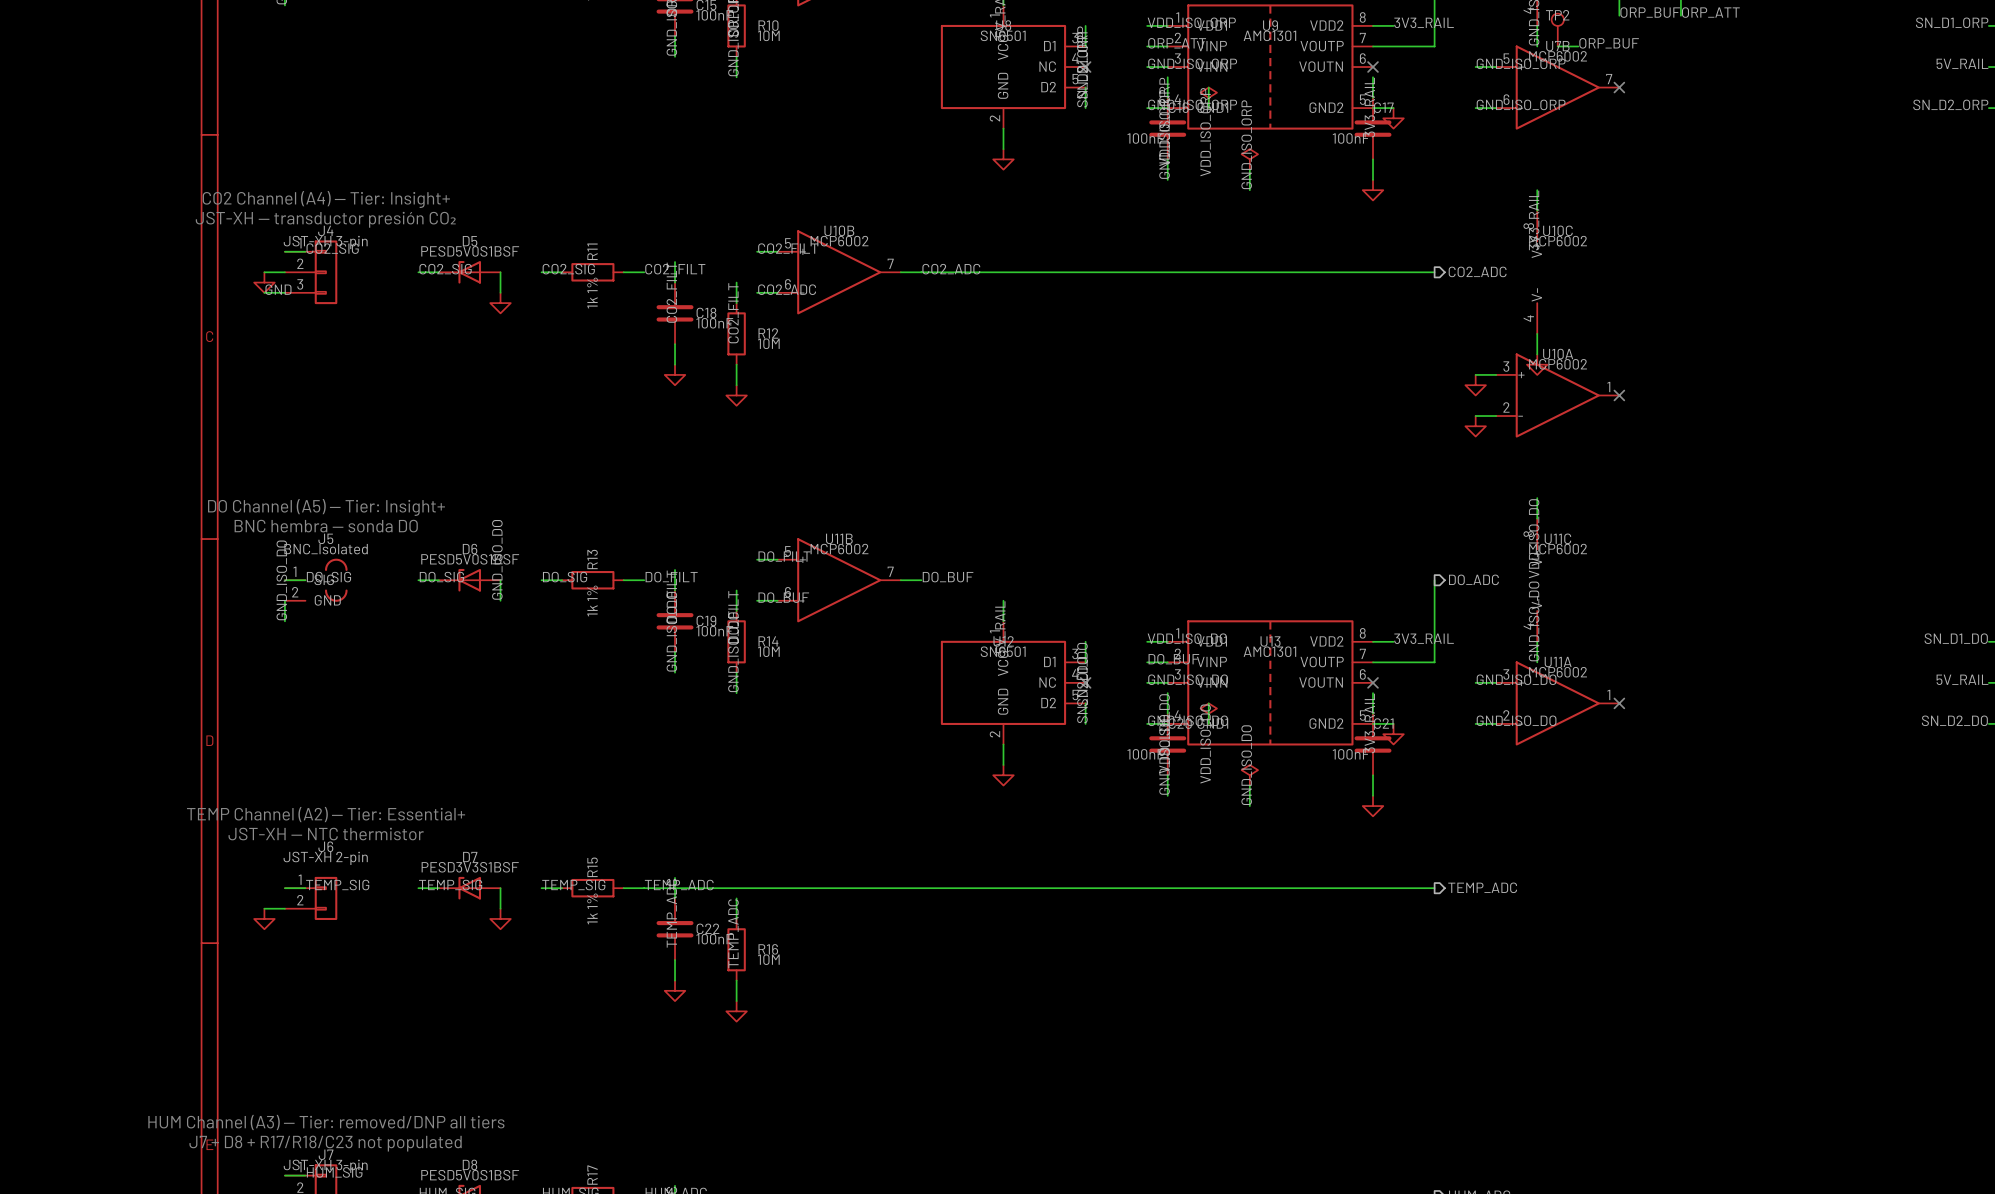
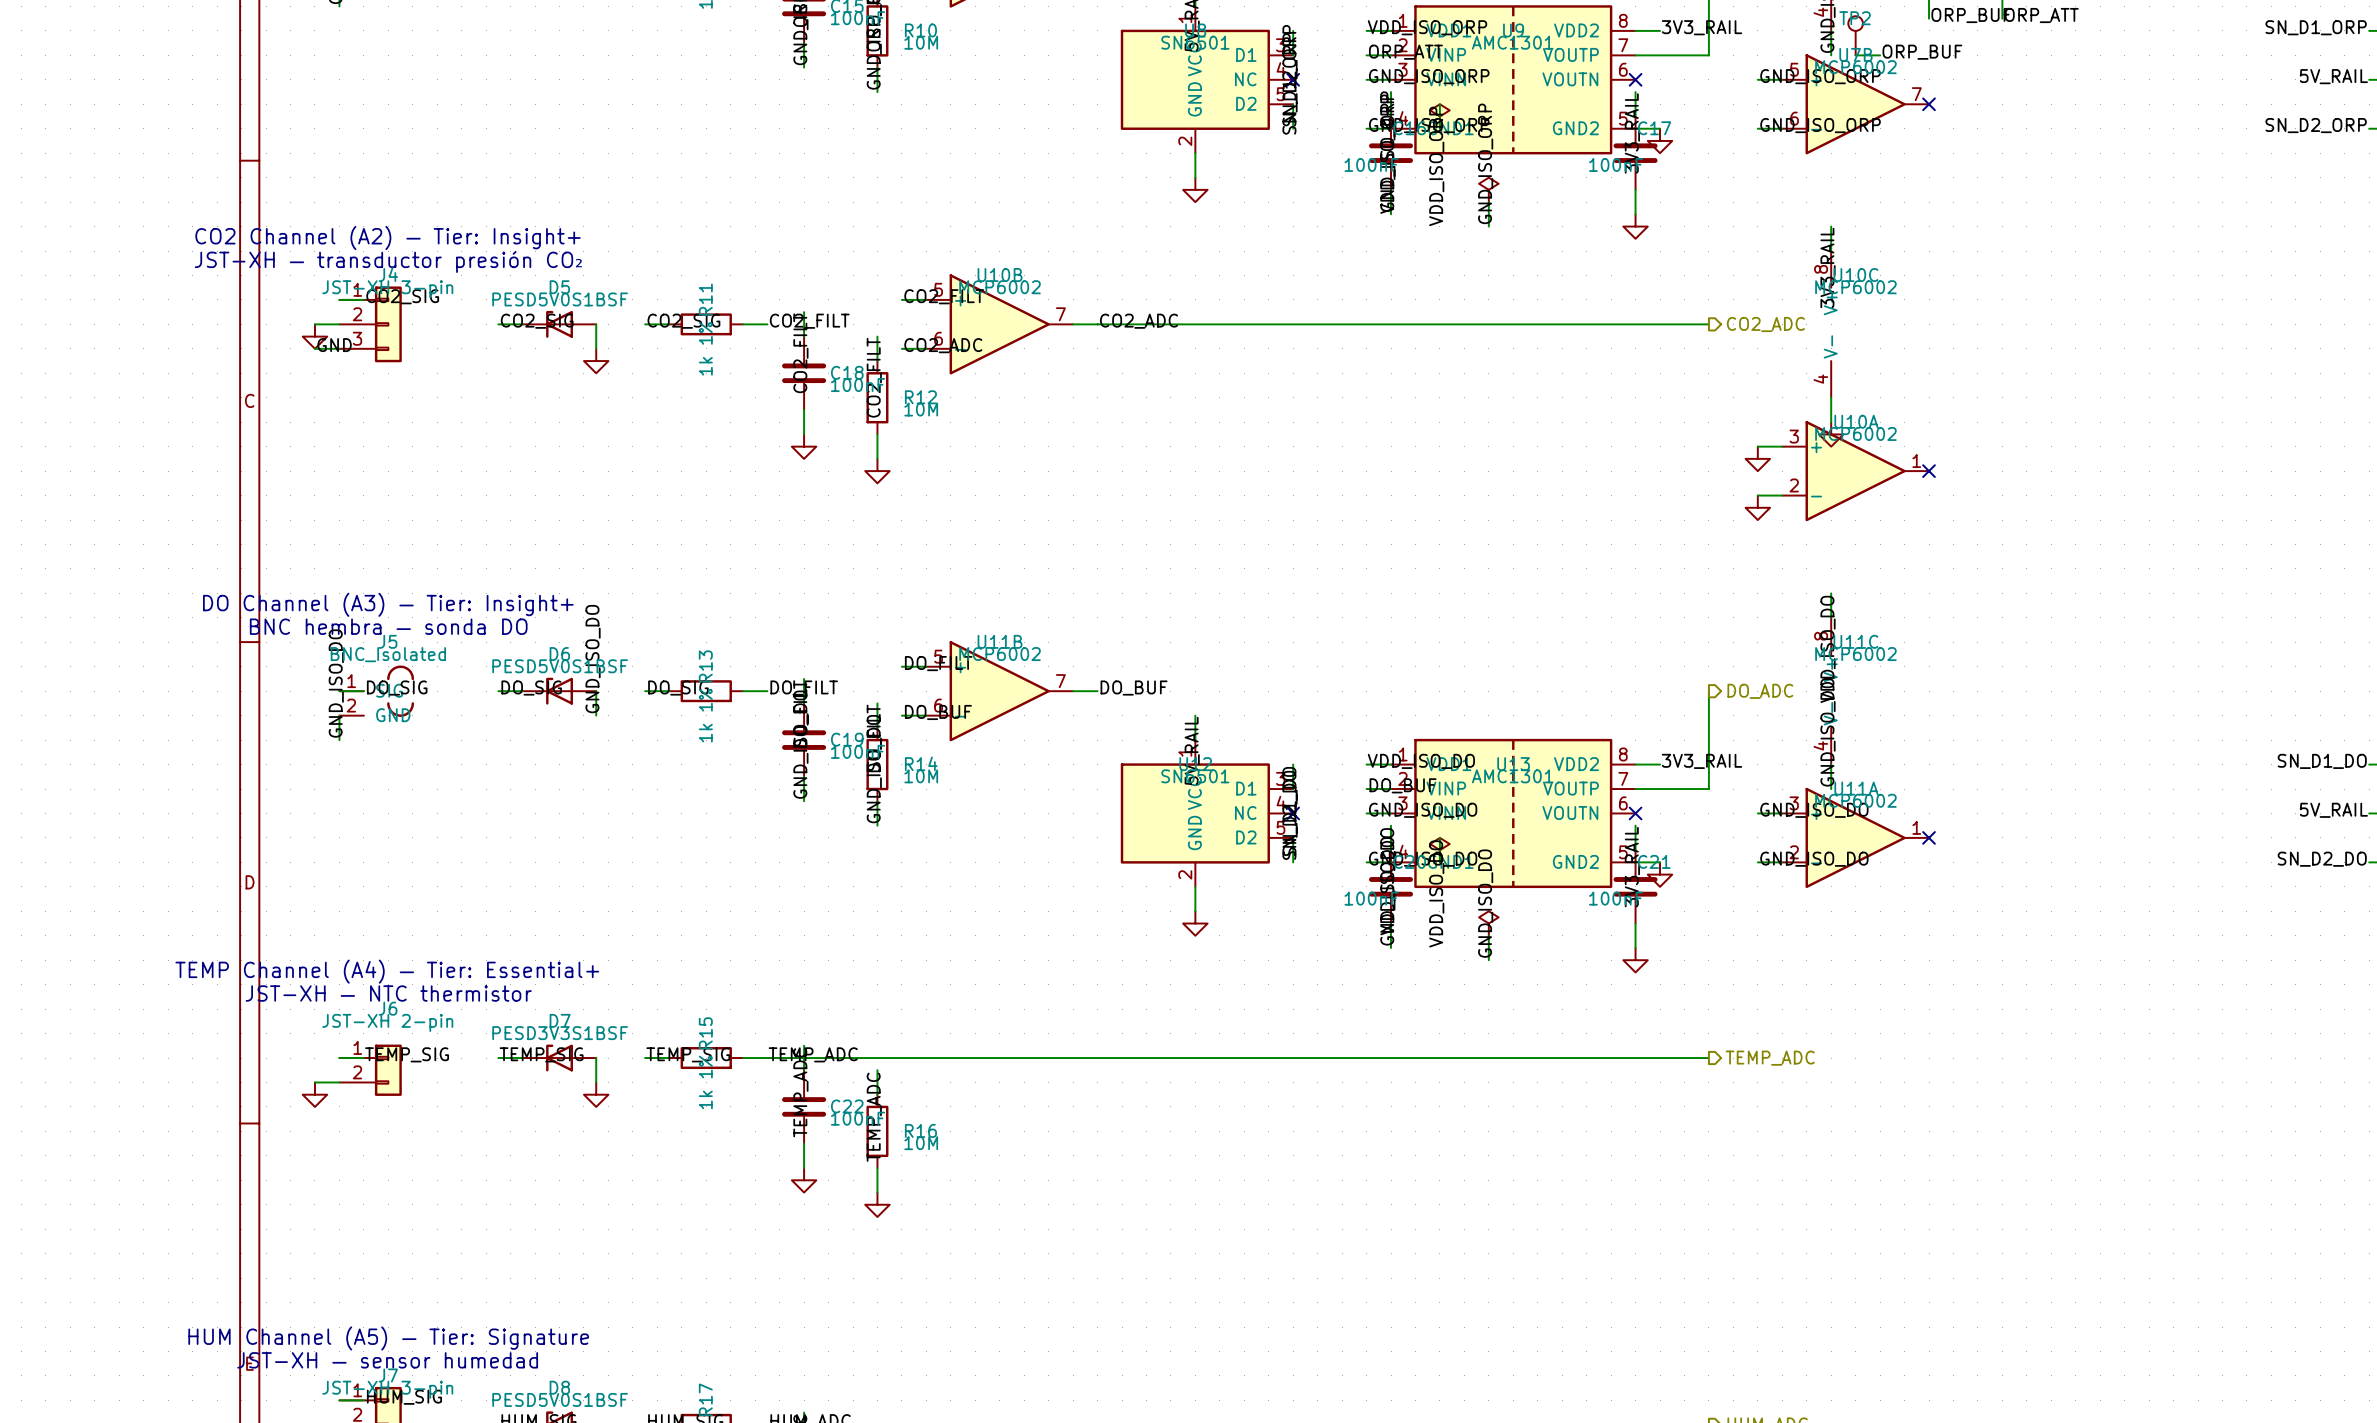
text: CO2 Channel (A4) — Tier: Insight+ (326, 199) -> CO2 Channel (A2) — Tier: Insight+ (388, 237)
text: DO Channel (A5) — Tier: Insight+ (326, 507) -> DO Channel (A3) — Tier: Insight+ (388, 604)
text: TEMP Channel (A2) — Tier: Essential+ (326, 814) -> TEMP Channel (A4) — Tier: Essential+ (387, 971)
text: HUM Channel (A3) — Tier: removed/DNP all tiers (326, 1122) -> HUM Channel (A5) — Tier: Signature (388, 1338)
text: J7 + D8 + R17/R18/C23 not populated (325, 1143) -> JST-XH — sensor humedad (387, 1360)

